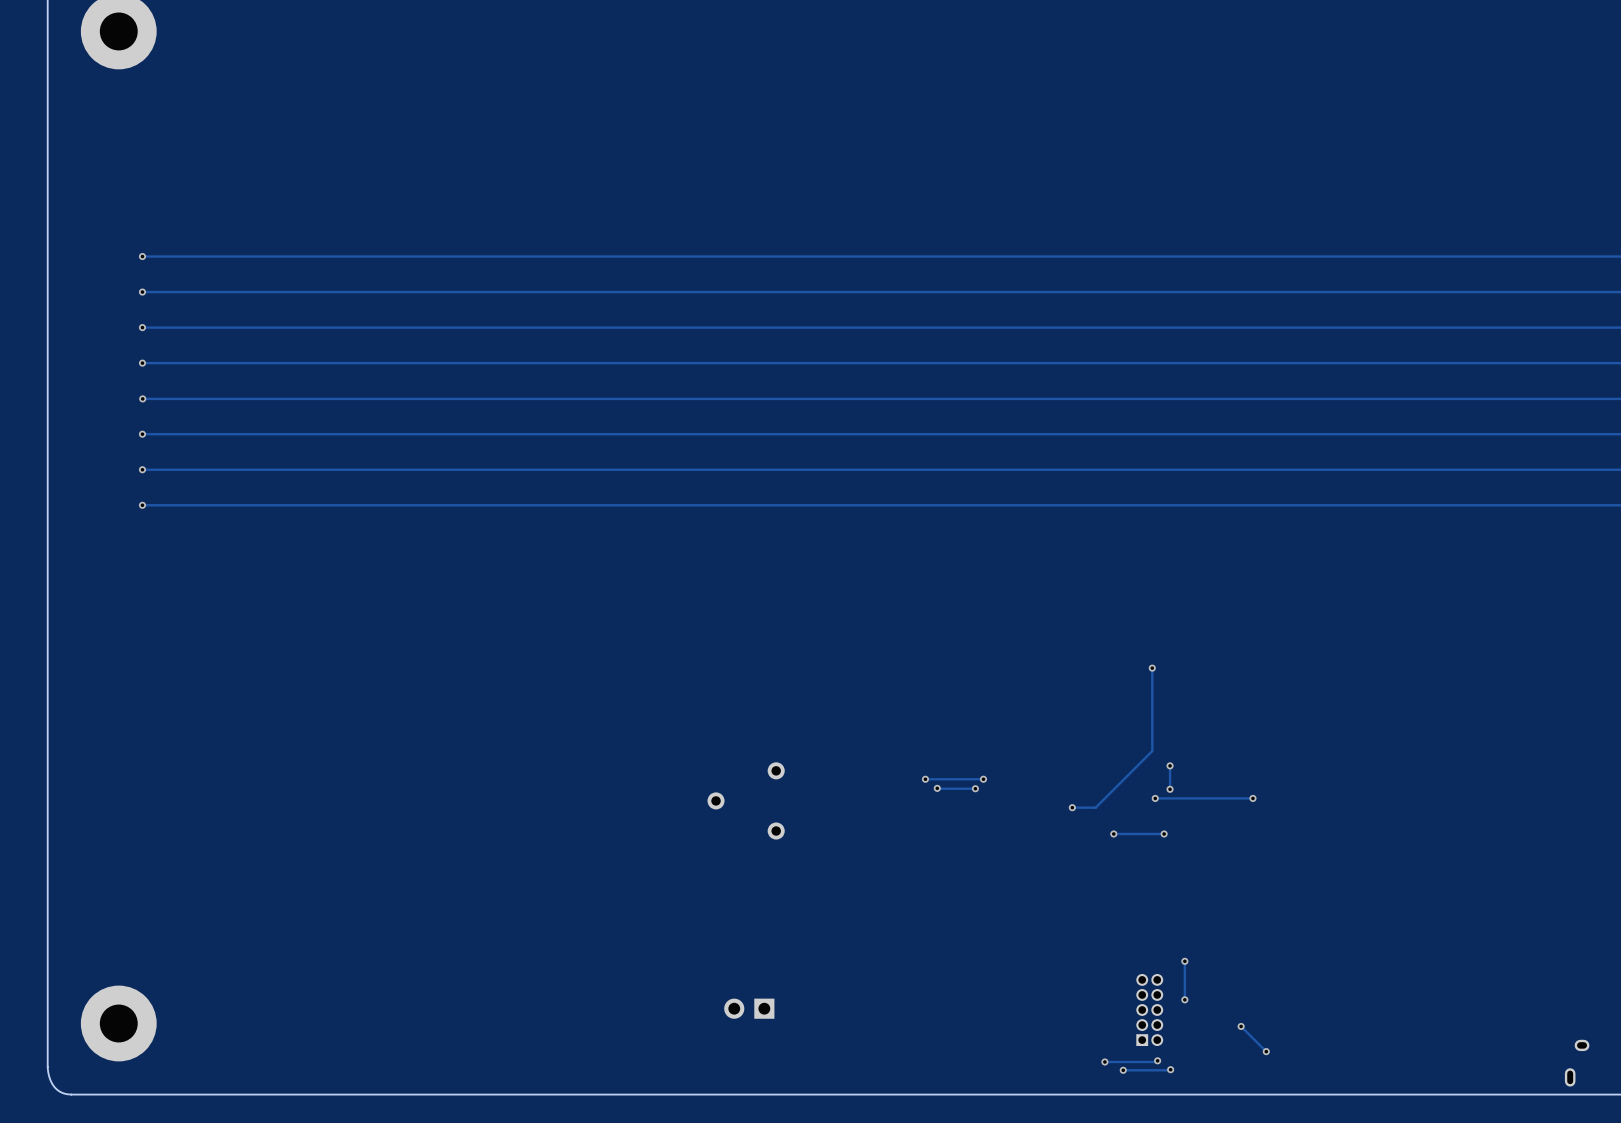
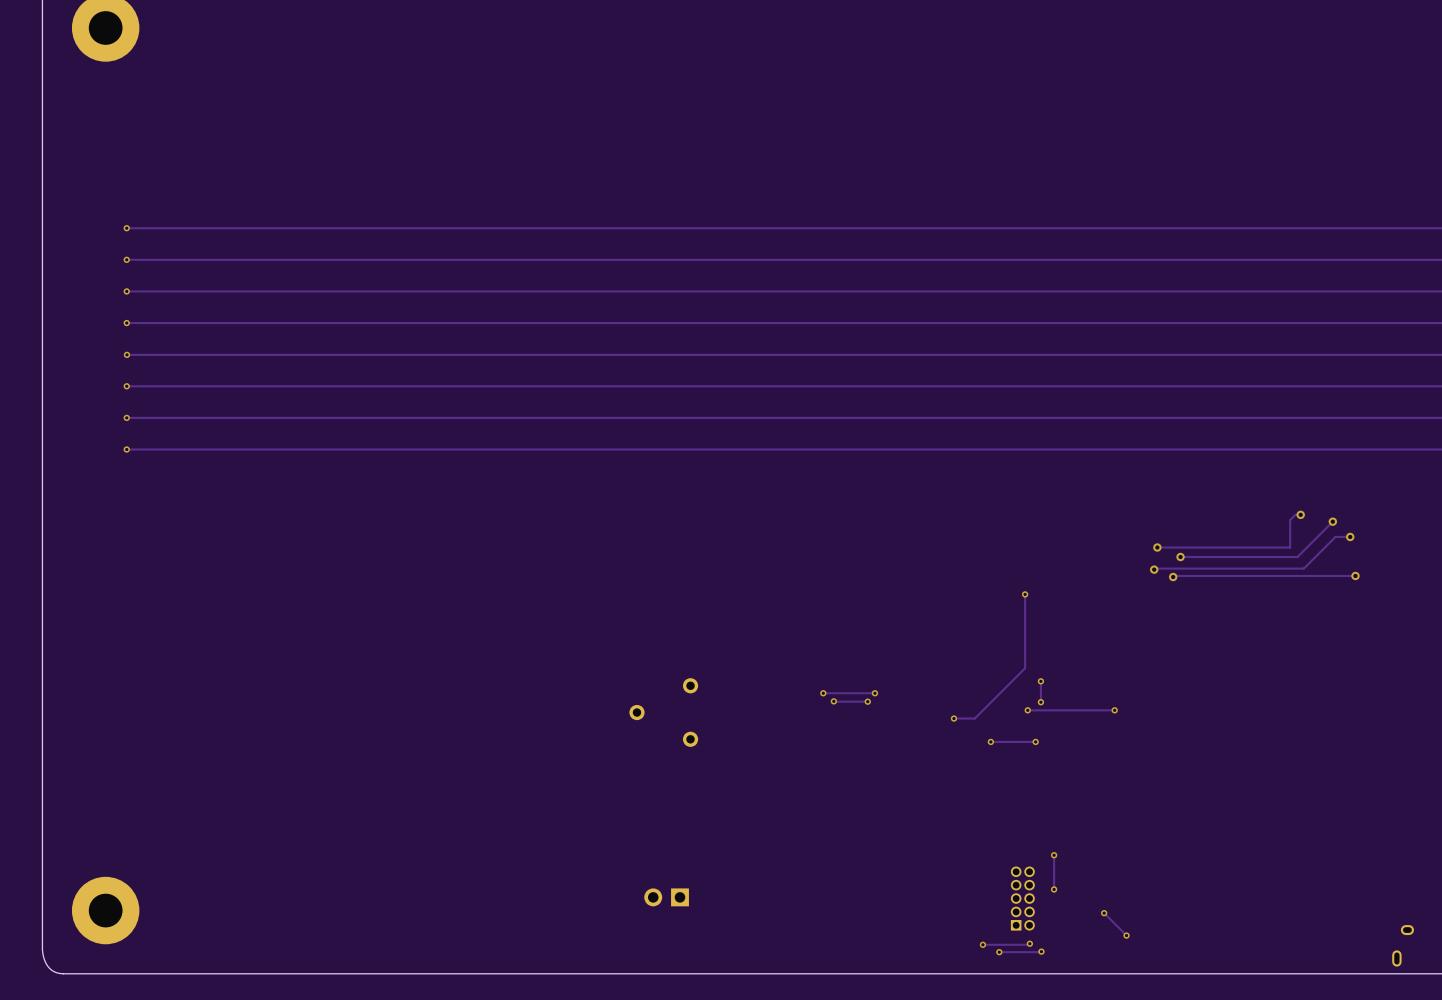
track: none -> (1300, 514) (1295, 514) (1290, 520) (1290, 547) (1157, 547)
via: none -> (1300, 514)
track: none -> (1332, 521) (1297, 557) (1180, 557)
via: none -> (1332, 521)
track: none -> (1350, 536) (1335, 536) (1303, 568) (1154, 569)
via: none -> (1350, 536)
via: none -> (1157, 547)
via: none -> (1180, 557)
via: none -> (1154, 569)
track: none -> (1355, 575) (1173, 577)
via: none -> (1355, 575)
via: none -> (1173, 577)

